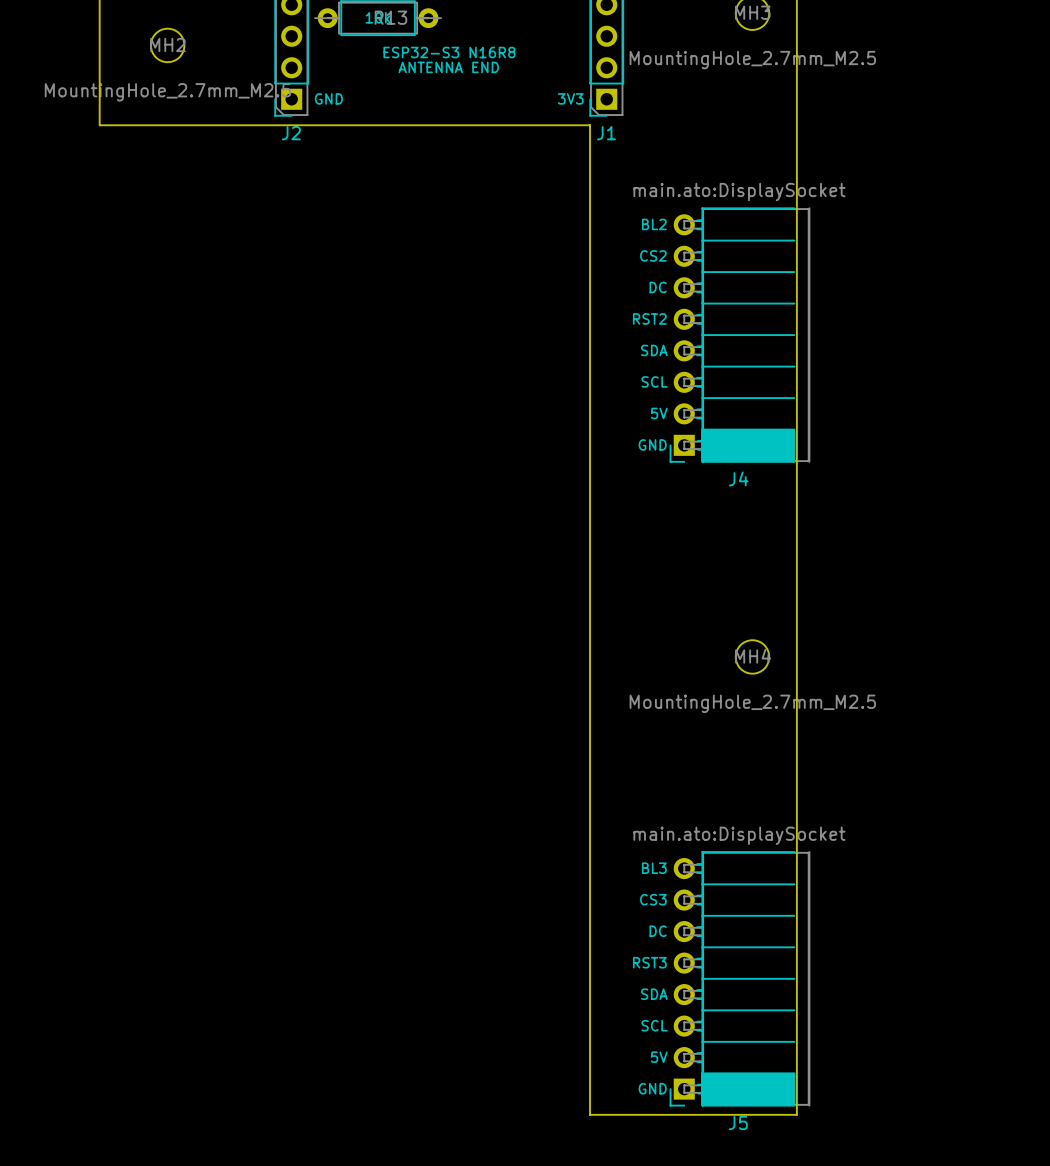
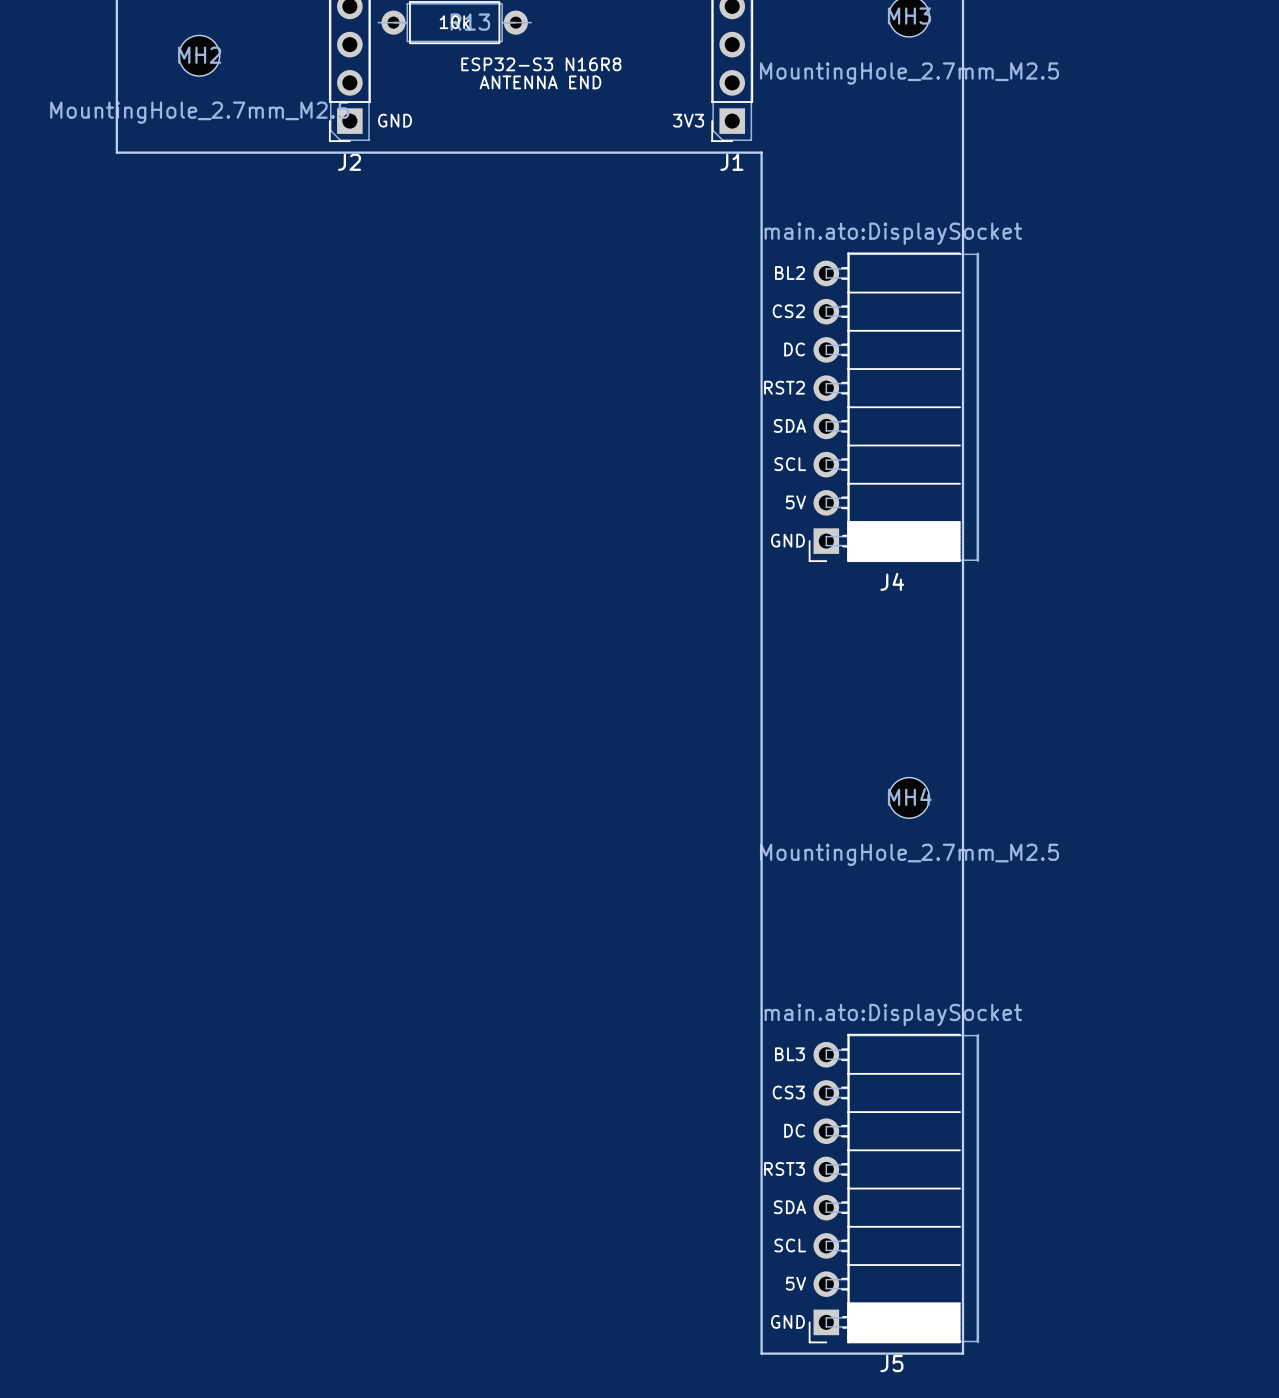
board edge: (590, 125) (590, 1114) (630, 1114) -> (711, 152) (761, 152) (761, 1353)

